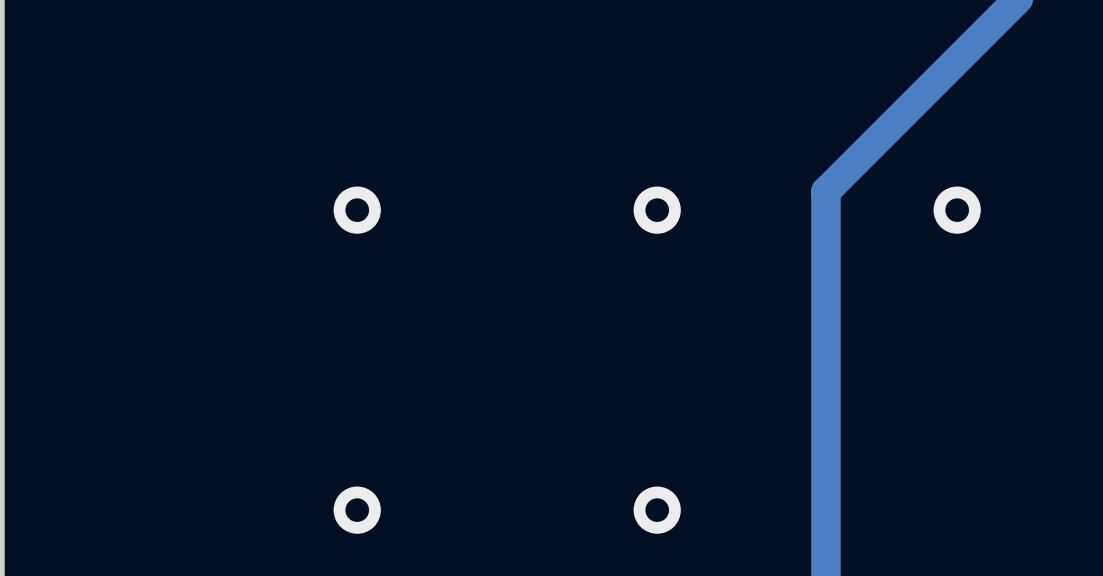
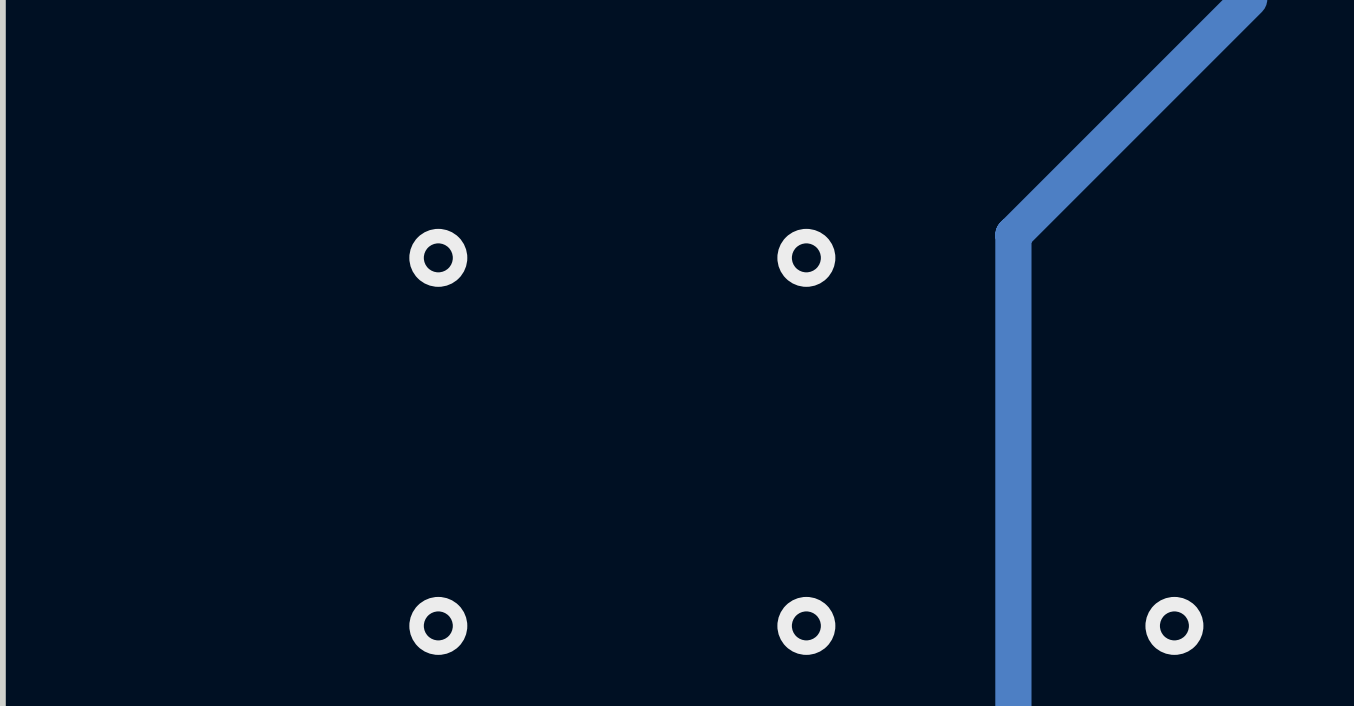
via position: (957, 210) -> (1174, 625)

